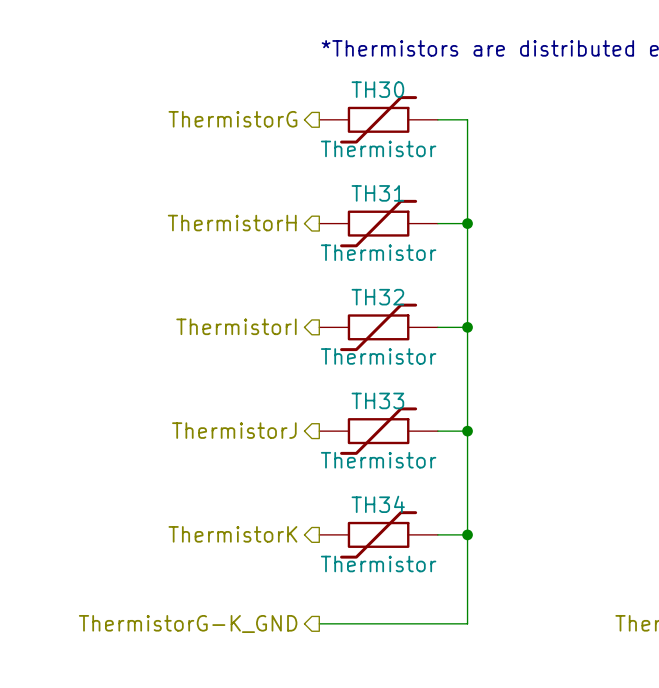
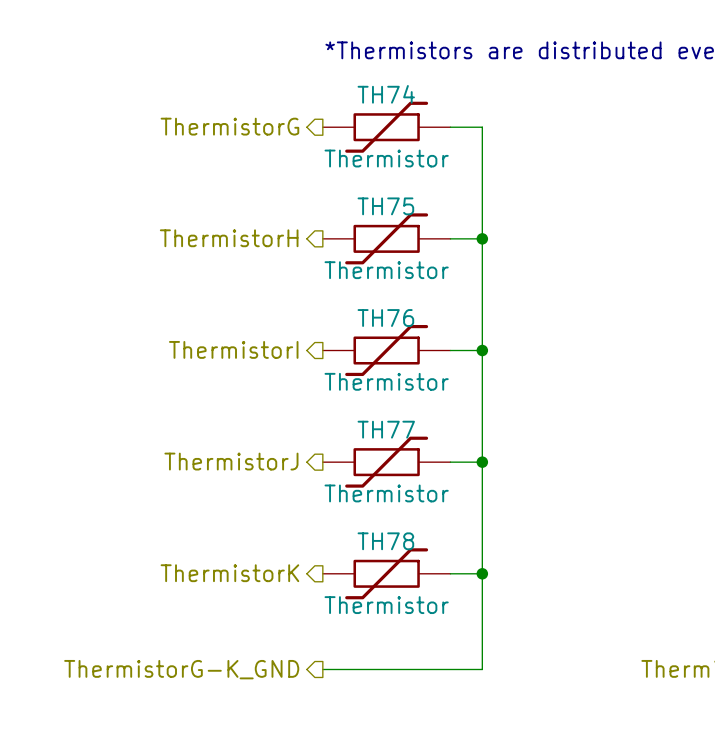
TH30 name: TH30 (377, 89) -> TH74 (386, 94)
TH31 name: TH31 (377, 193) -> TH75 (385, 206)
TH32 name: TH32 (377, 297) -> TH76 (385, 318)
TH33 name: TH33 (377, 400) -> TH77 (386, 429)
TH34 name: TH34 (378, 504) -> TH78 (385, 541)

